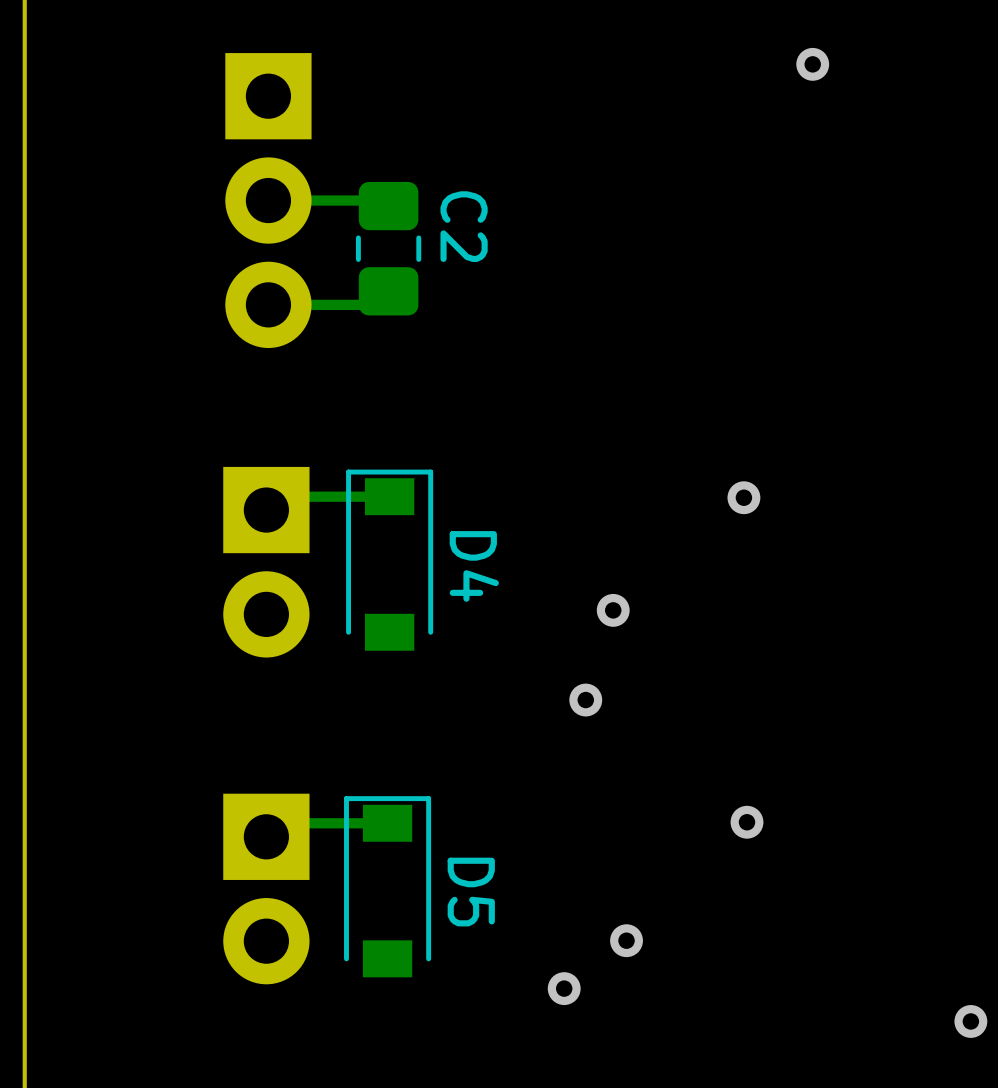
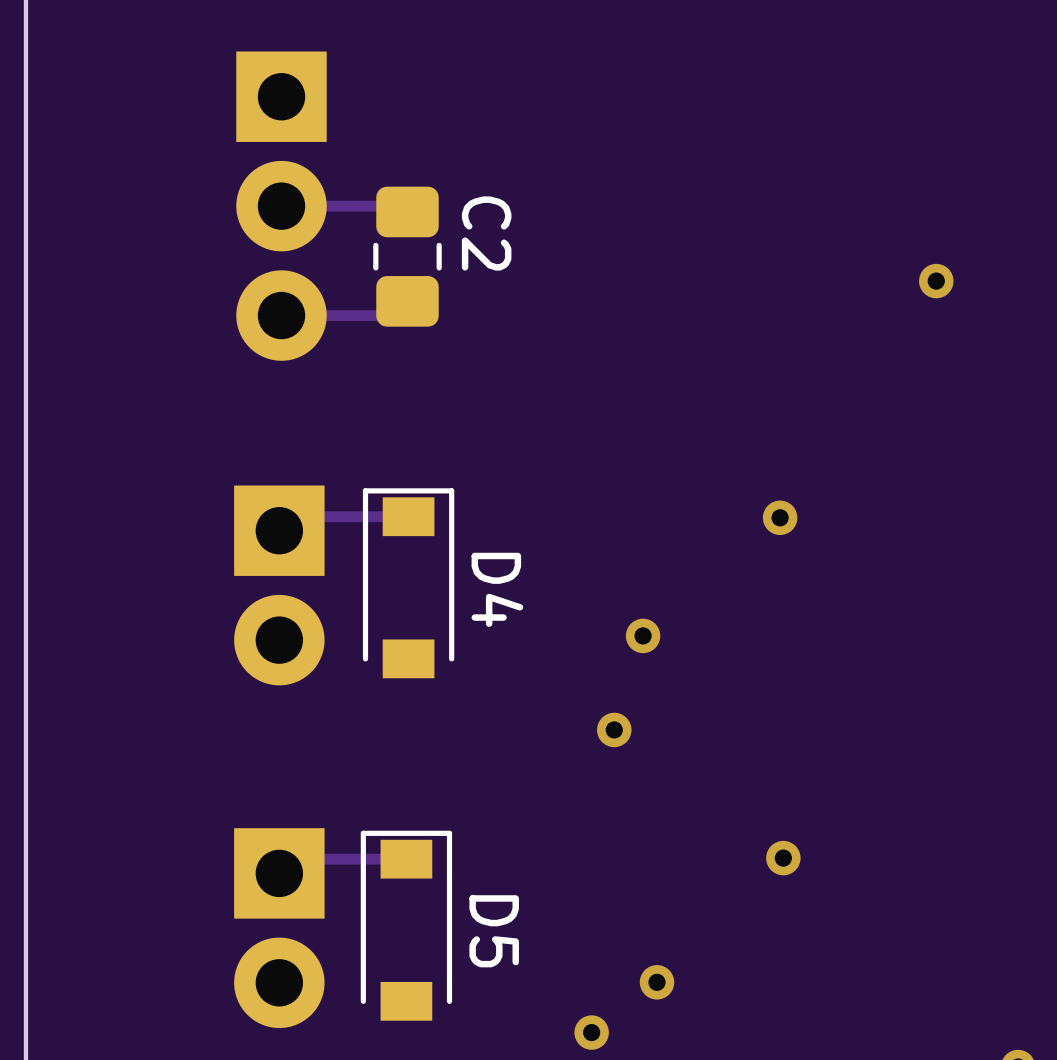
via: (812, 64) -> none
via: none -> (936, 281)

